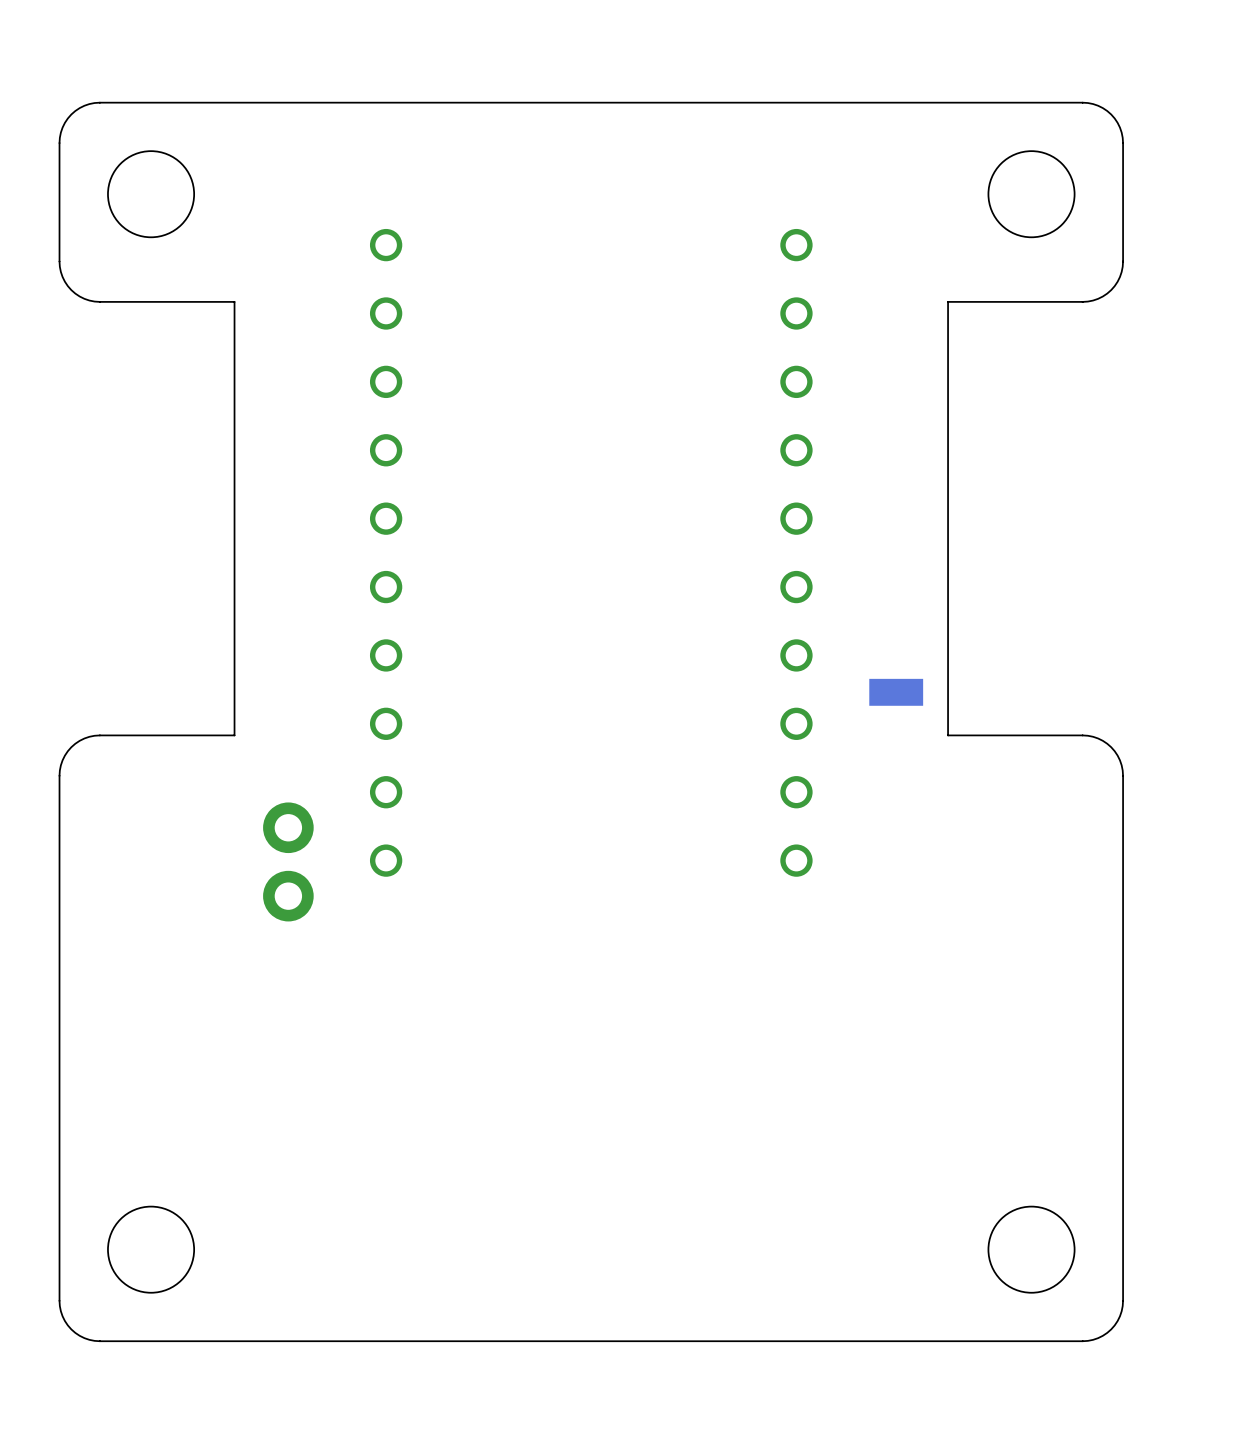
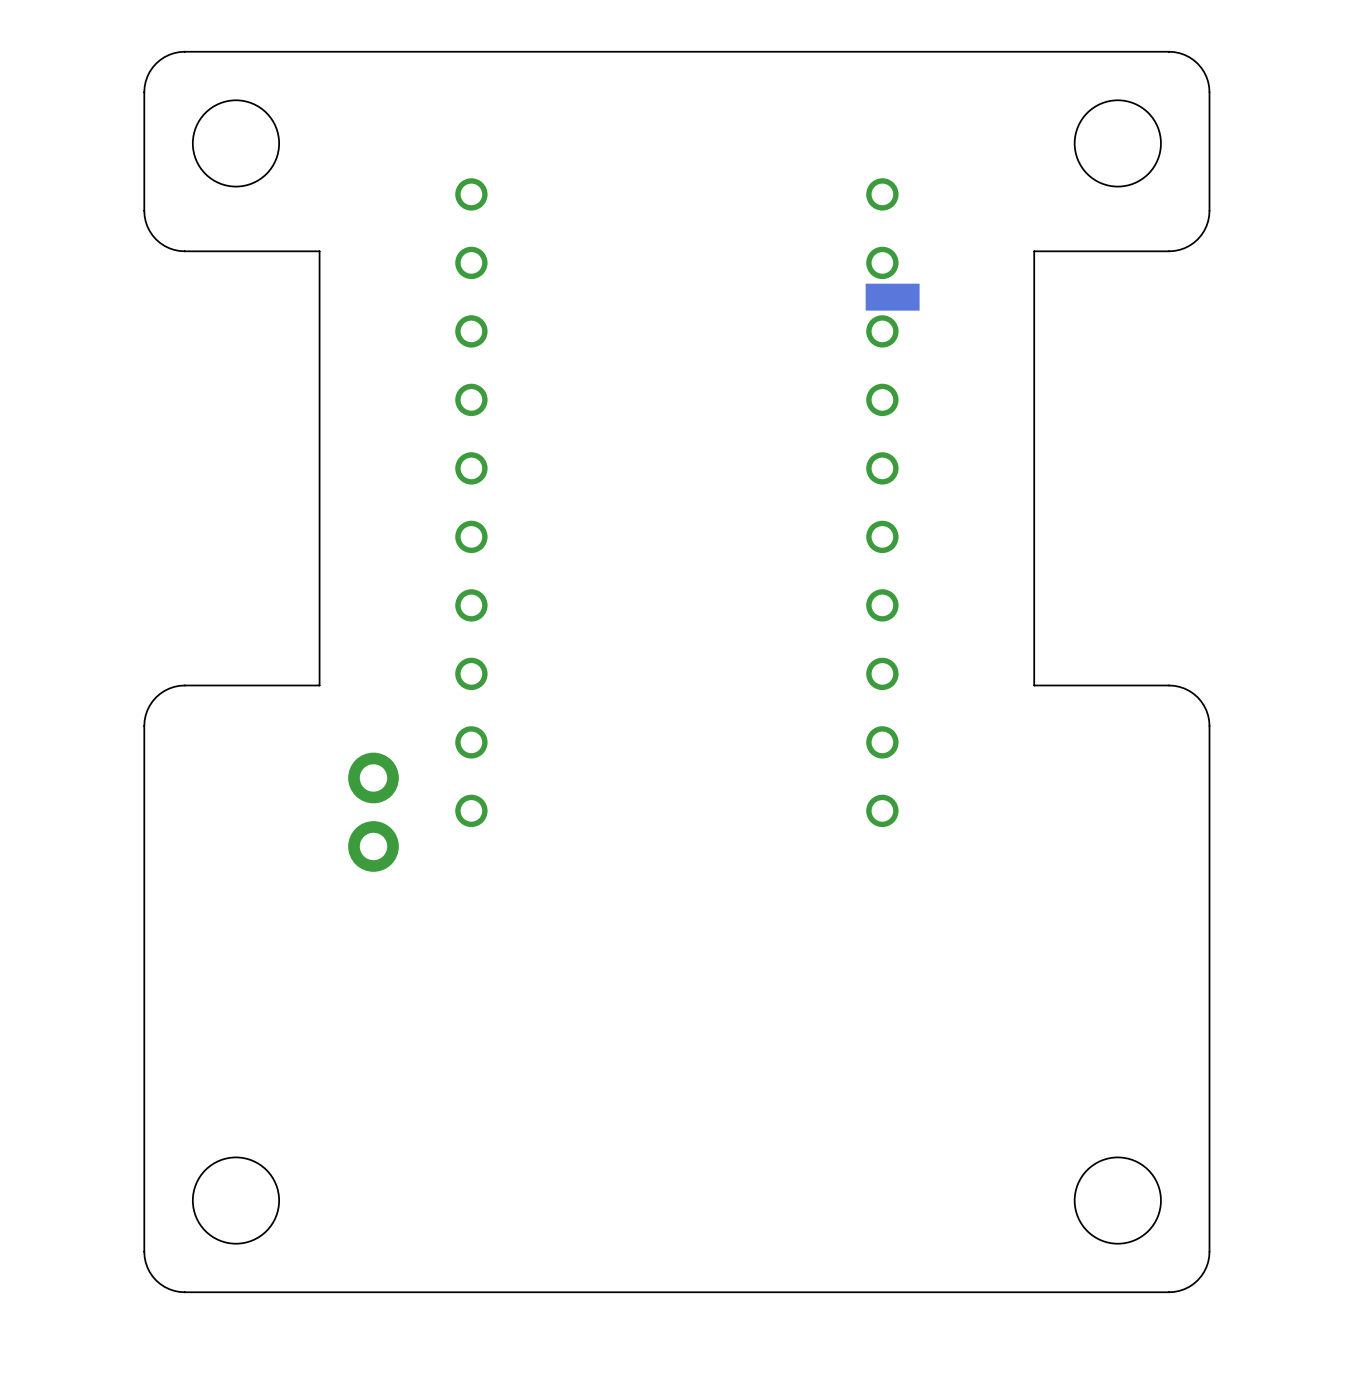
part position: (896, 692) -> (892, 297)

